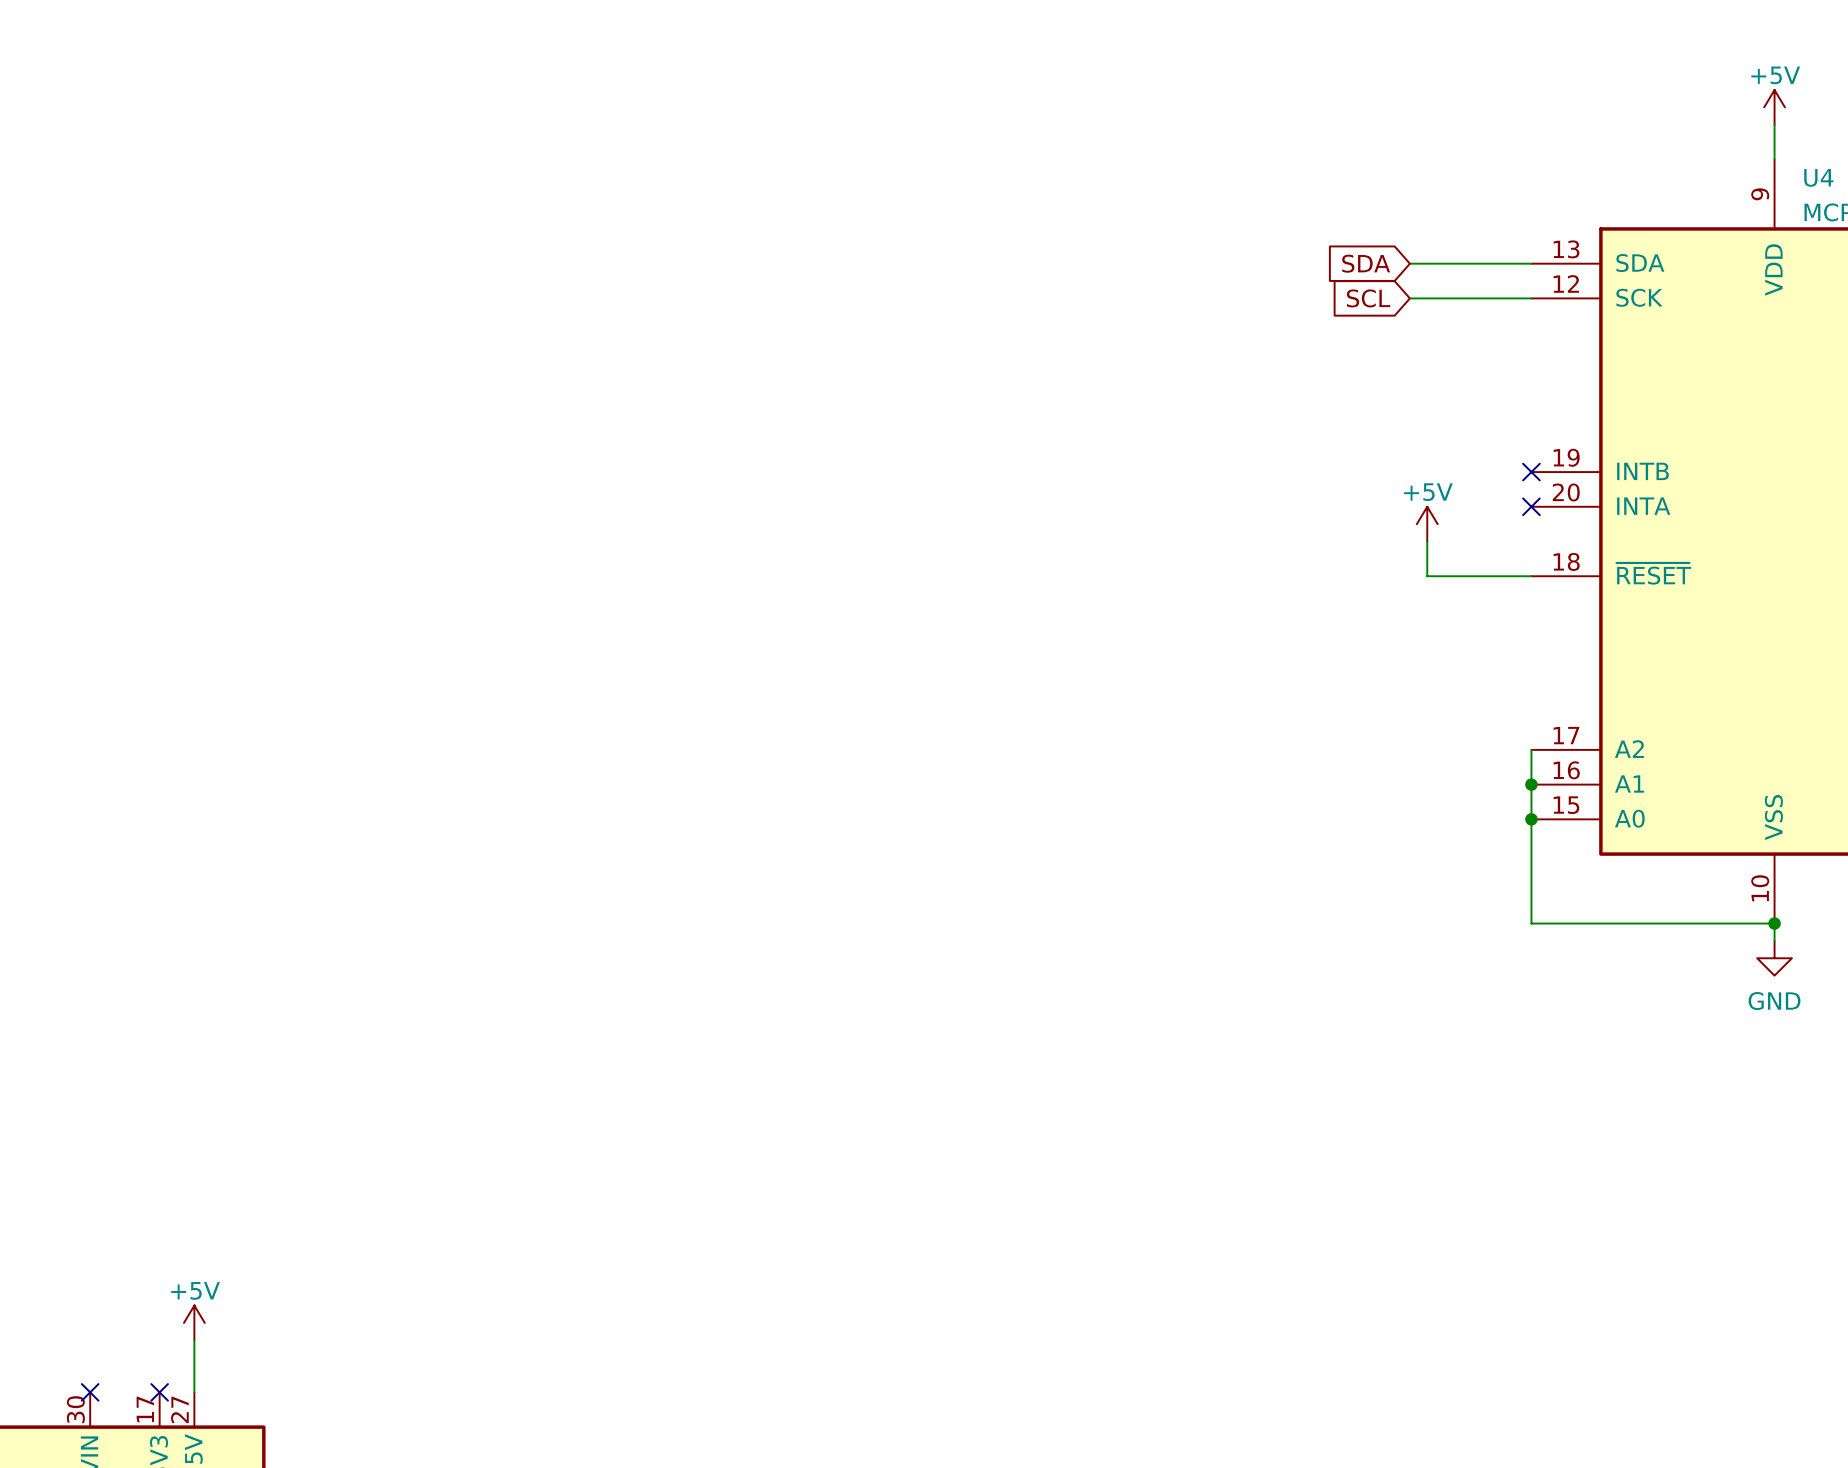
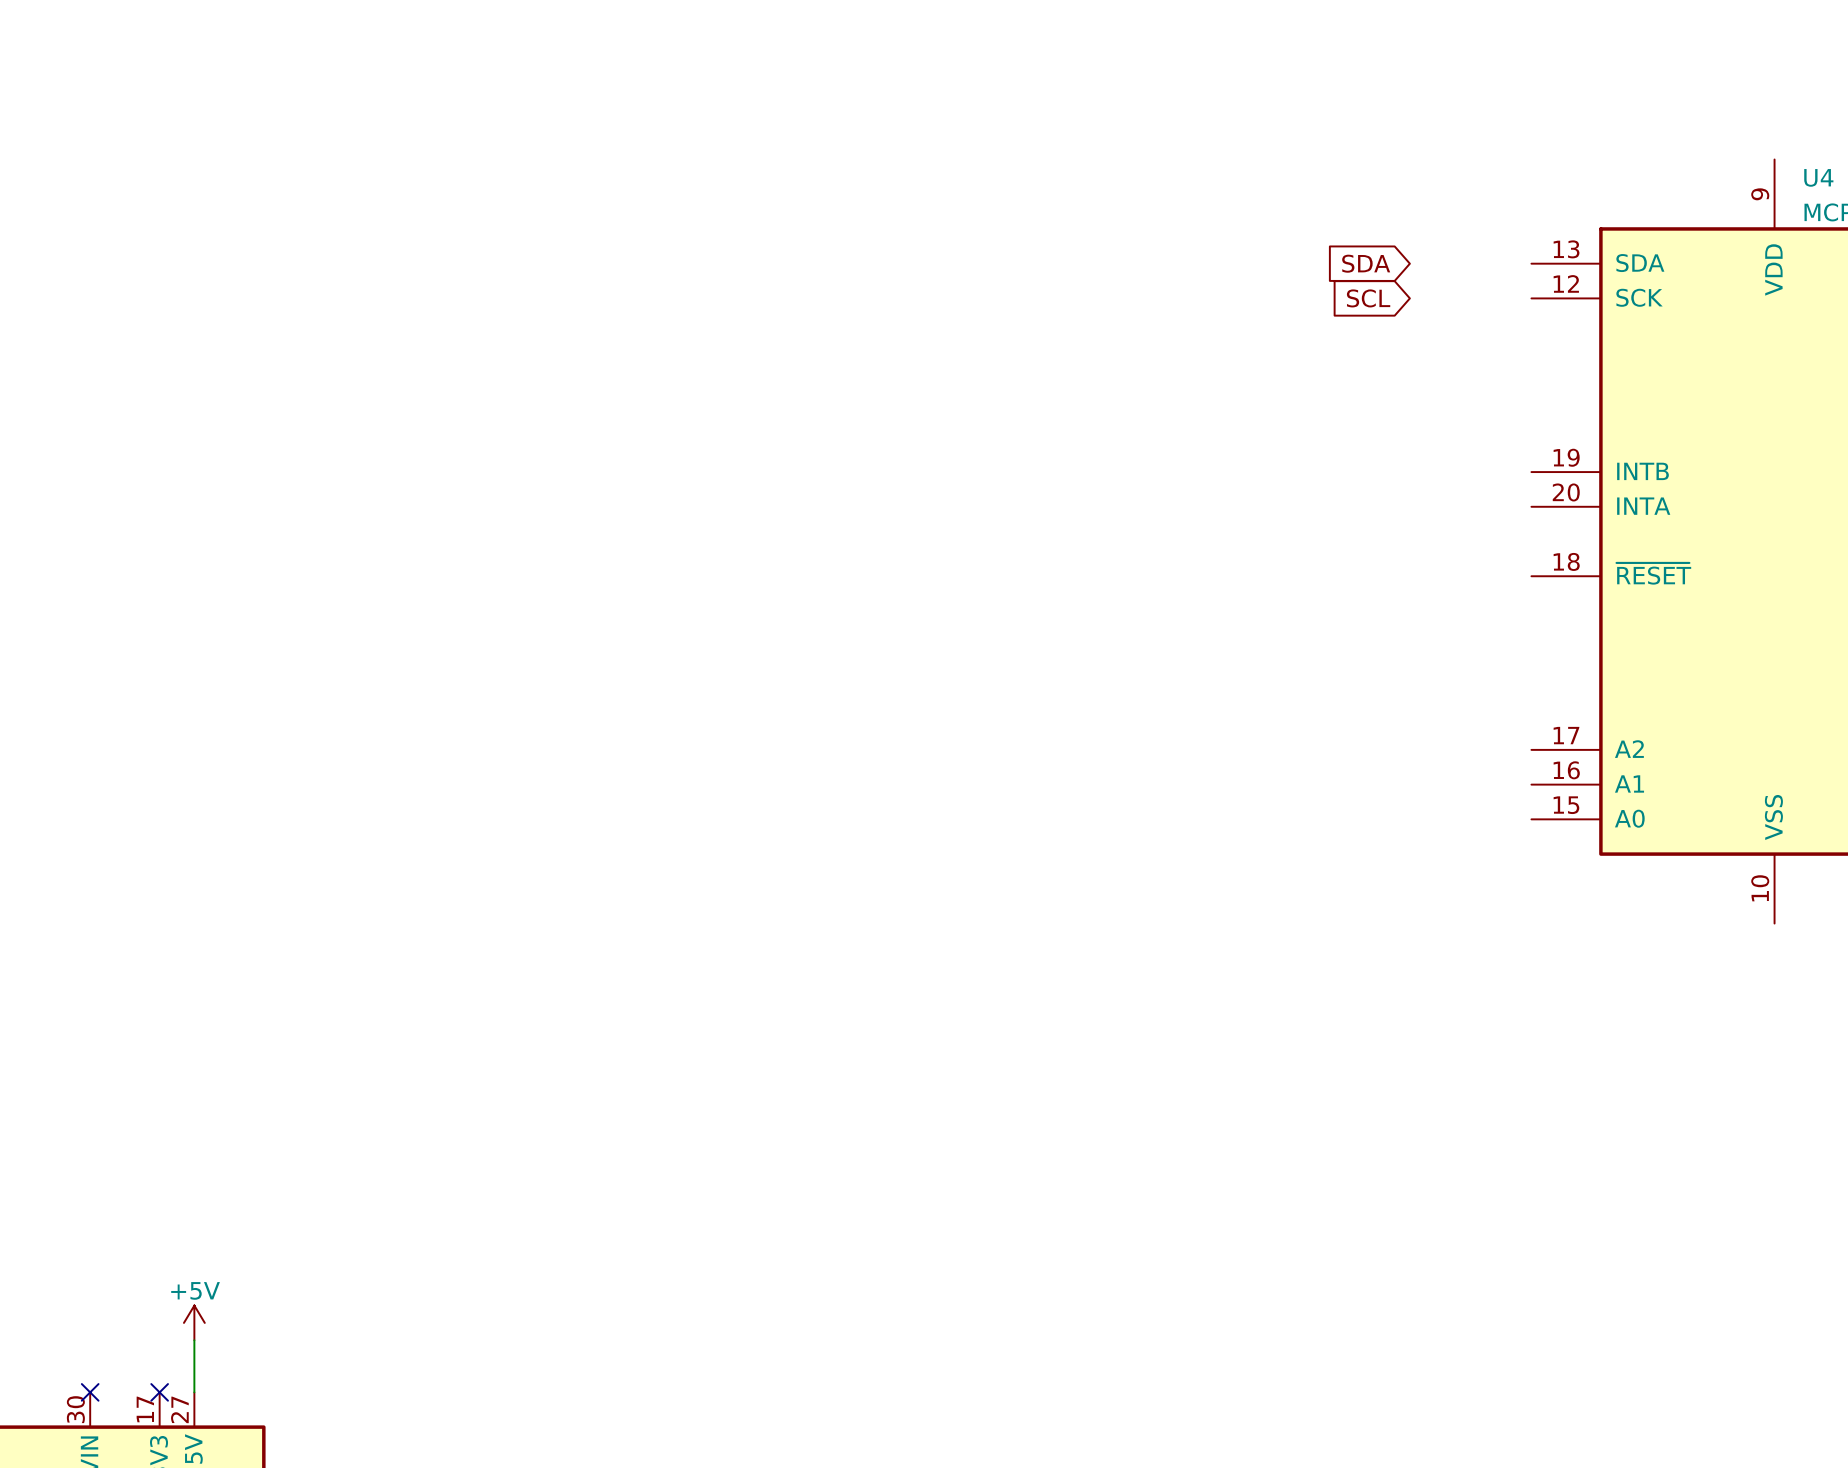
power symbol: +5V (1774, 107) -> none
wire: (1774, 124) (1774, 159) -> none
wire: (1409, 263) (1531, 263) -> none
wire: (1409, 298) (1531, 298) -> none
no-connect mark: (1531, 472) -> none
no-connect mark: (1531, 506) -> none
power symbol: +5V (1427, 524) -> none
wire: (1427, 541) (1427, 576) (1531, 576) -> none
wire: (1531, 749) (1531, 923) (1774, 923) (1774, 940) -> none
junction: (1531, 784) -> none
junction: (1531, 819) -> none
junction: (1774, 923) -> none
power symbol: GND (1774, 958) -> none

